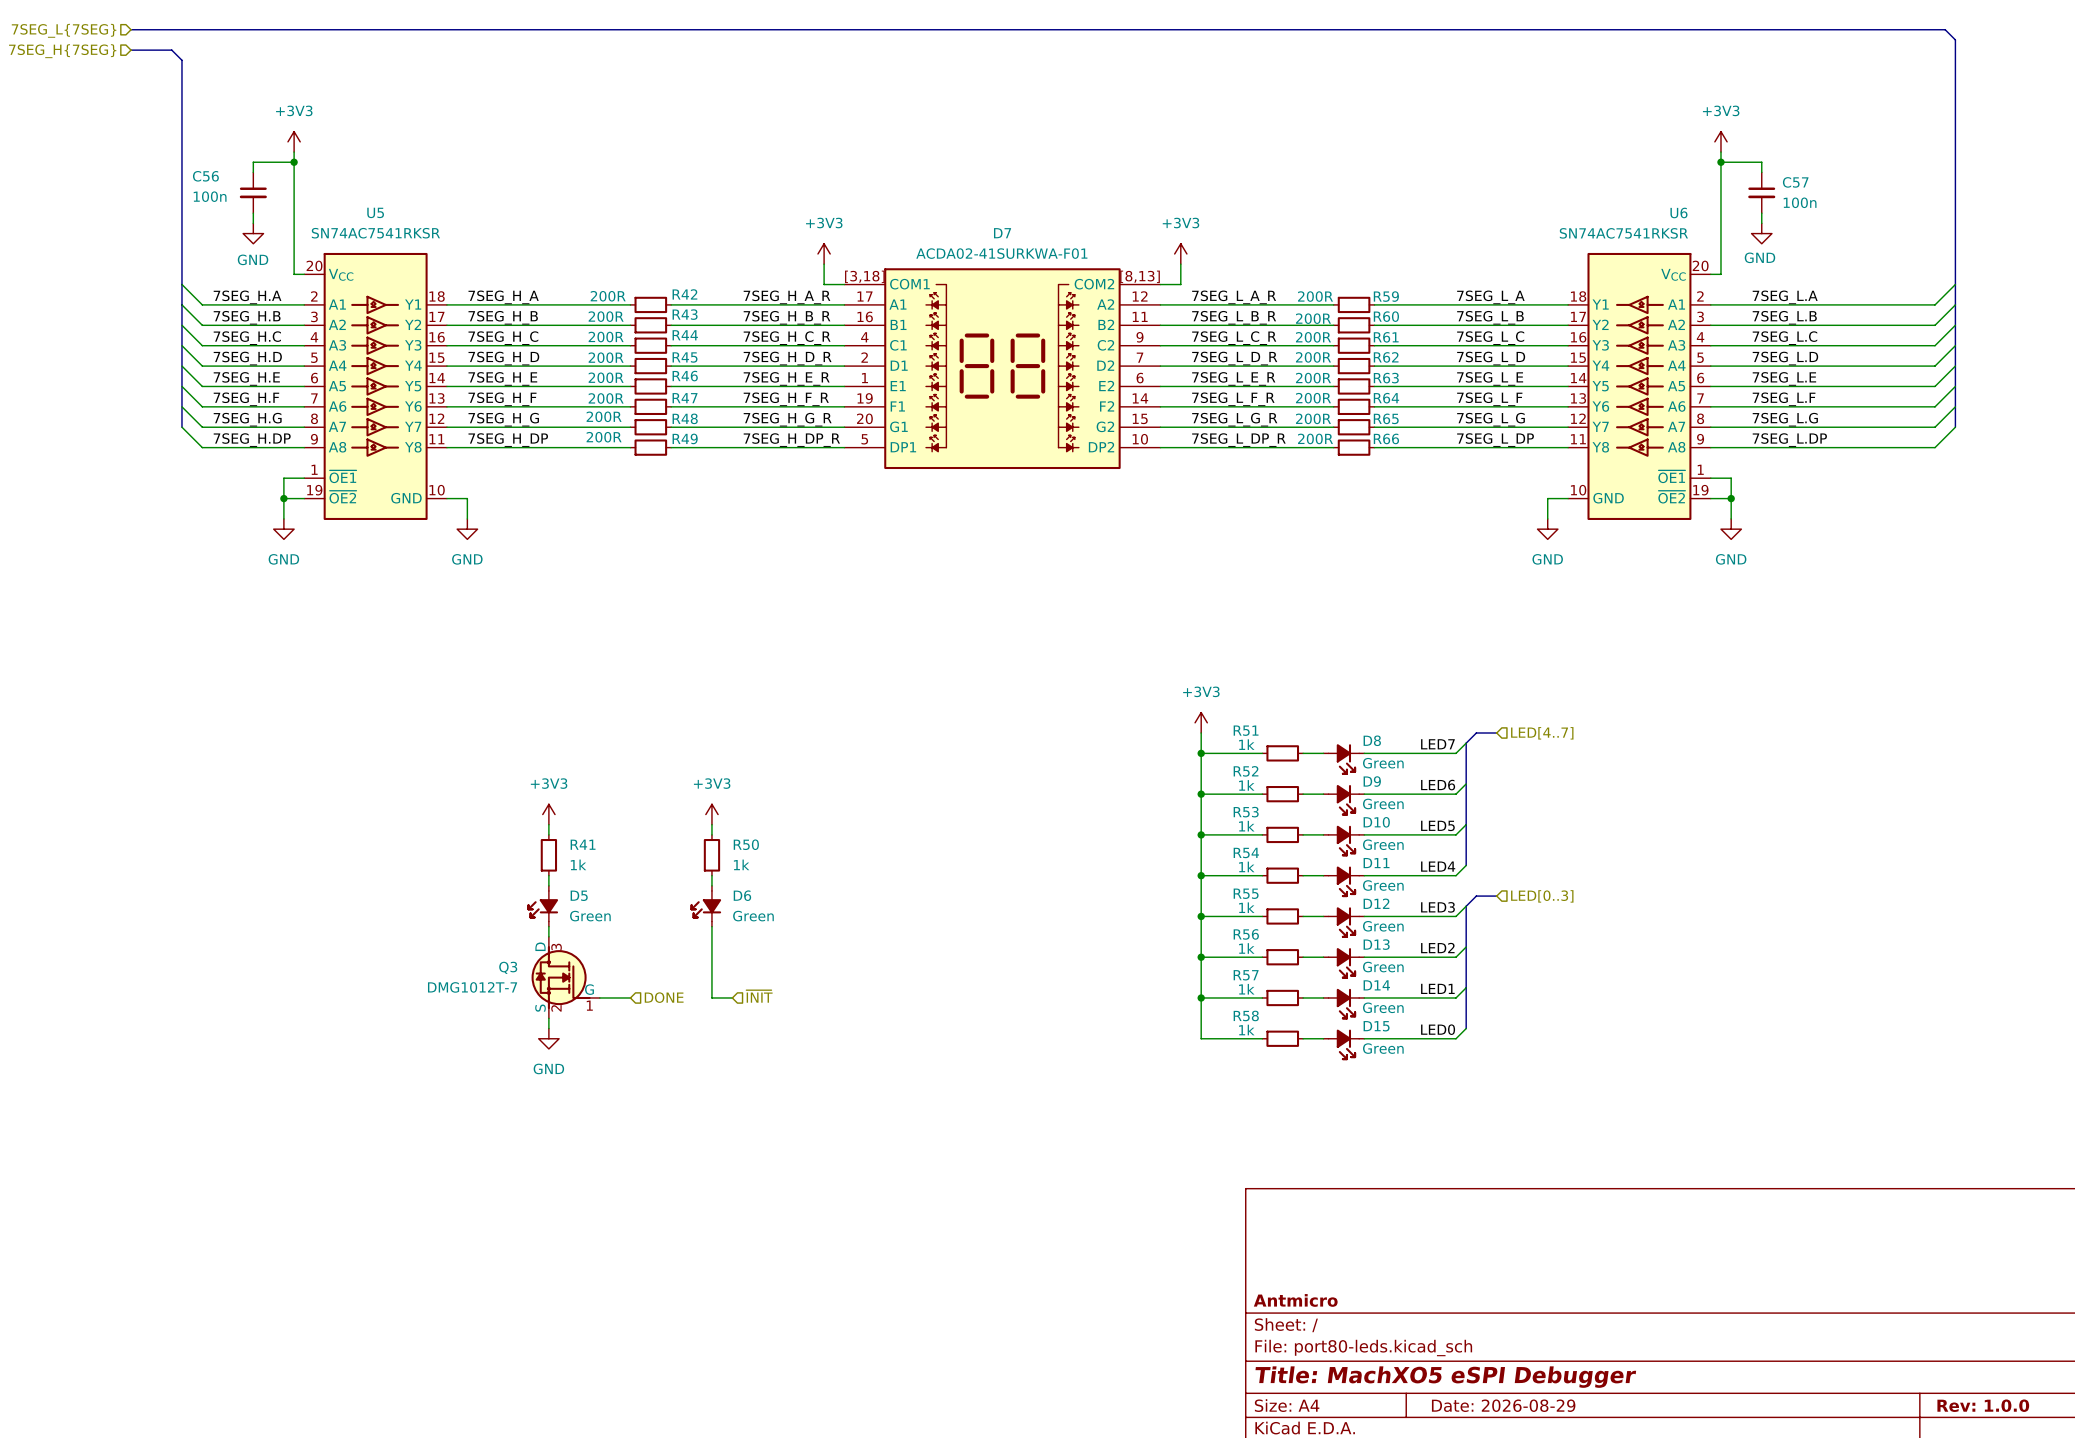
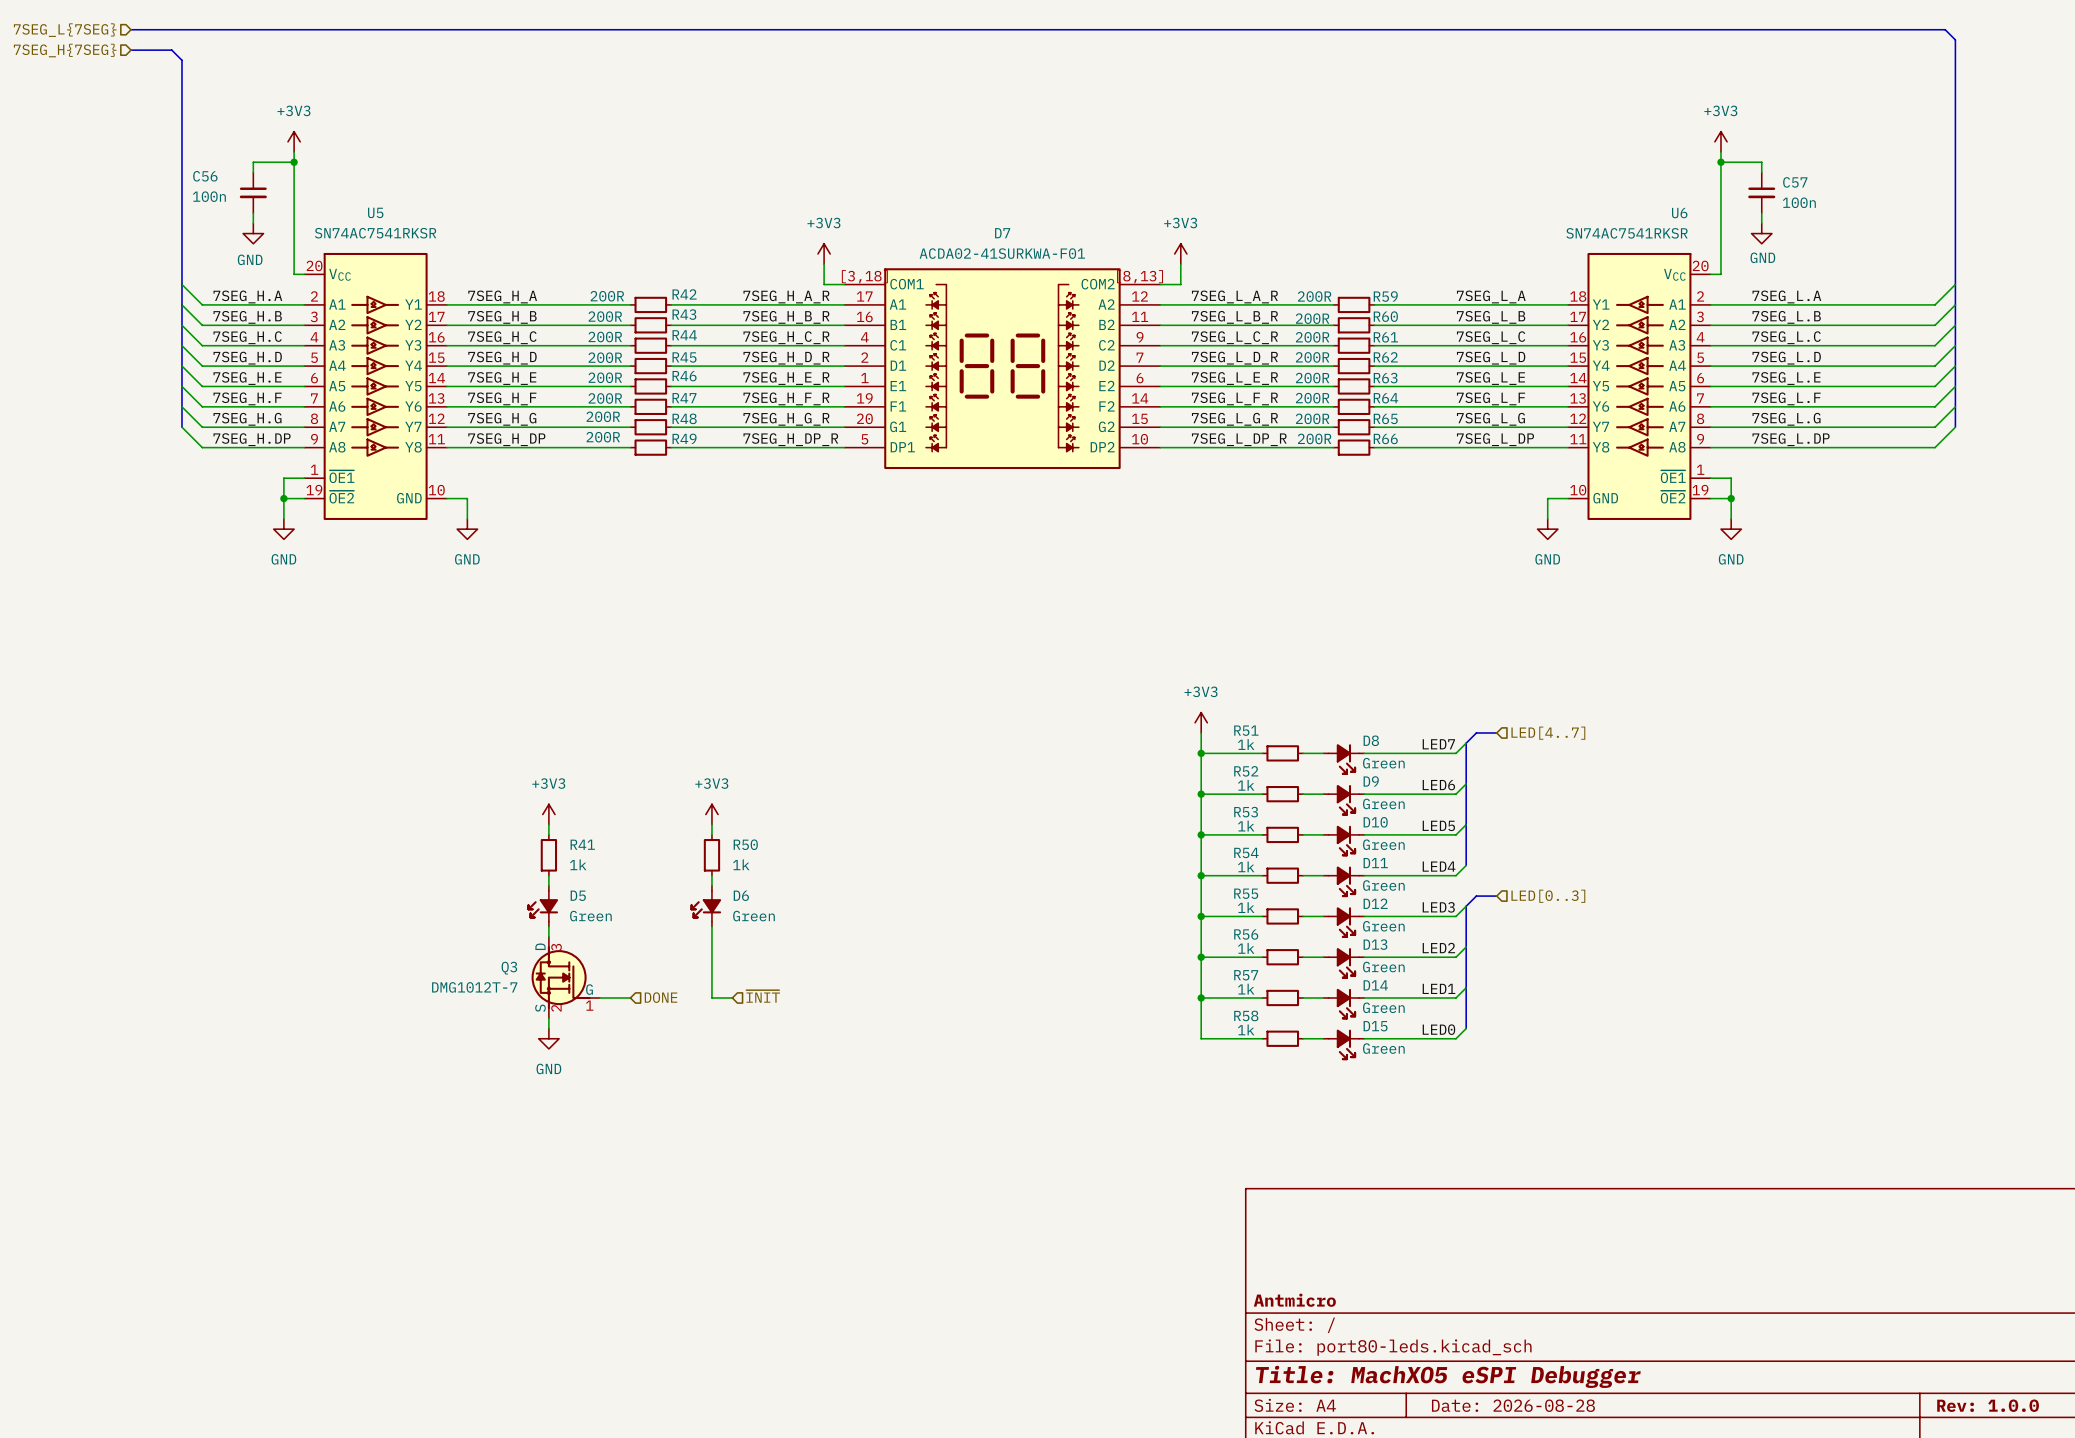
title block: Date: 2026-08-29 (1503, 1405) -> Date: 2026-08-28 (1513, 1405)

